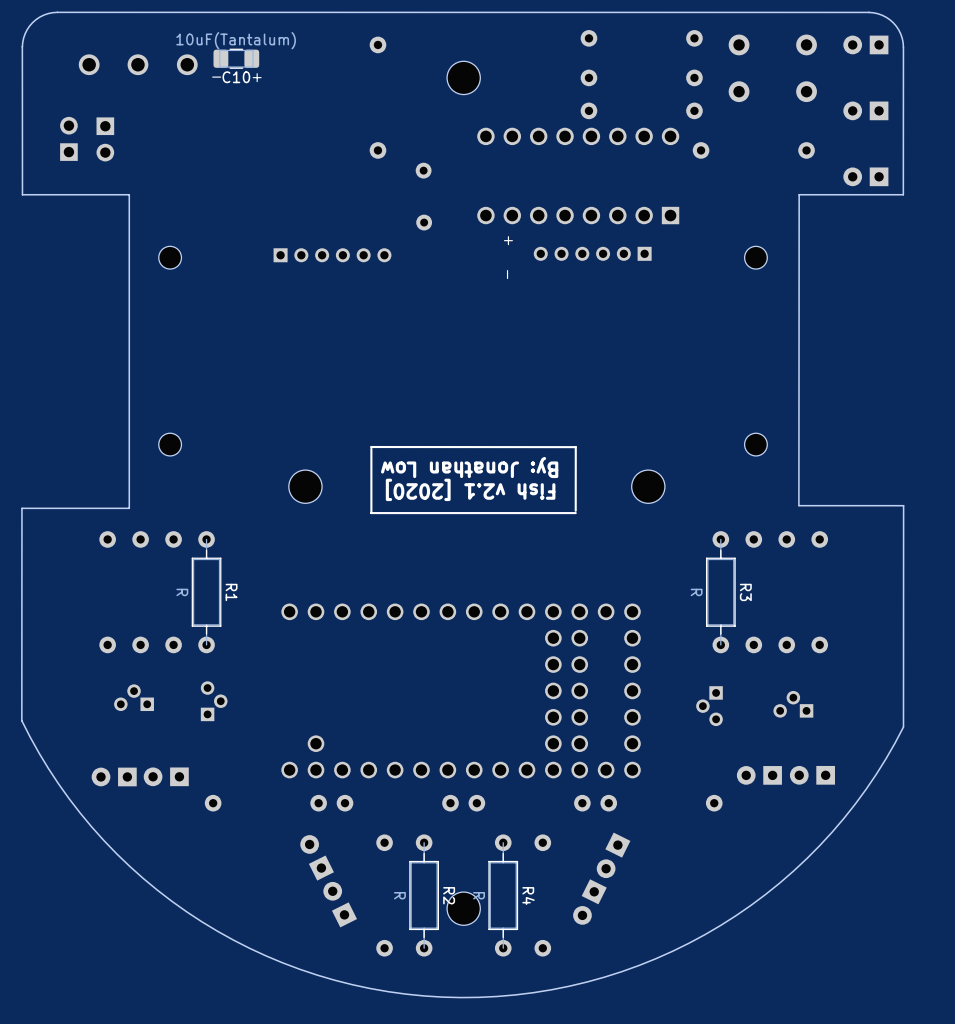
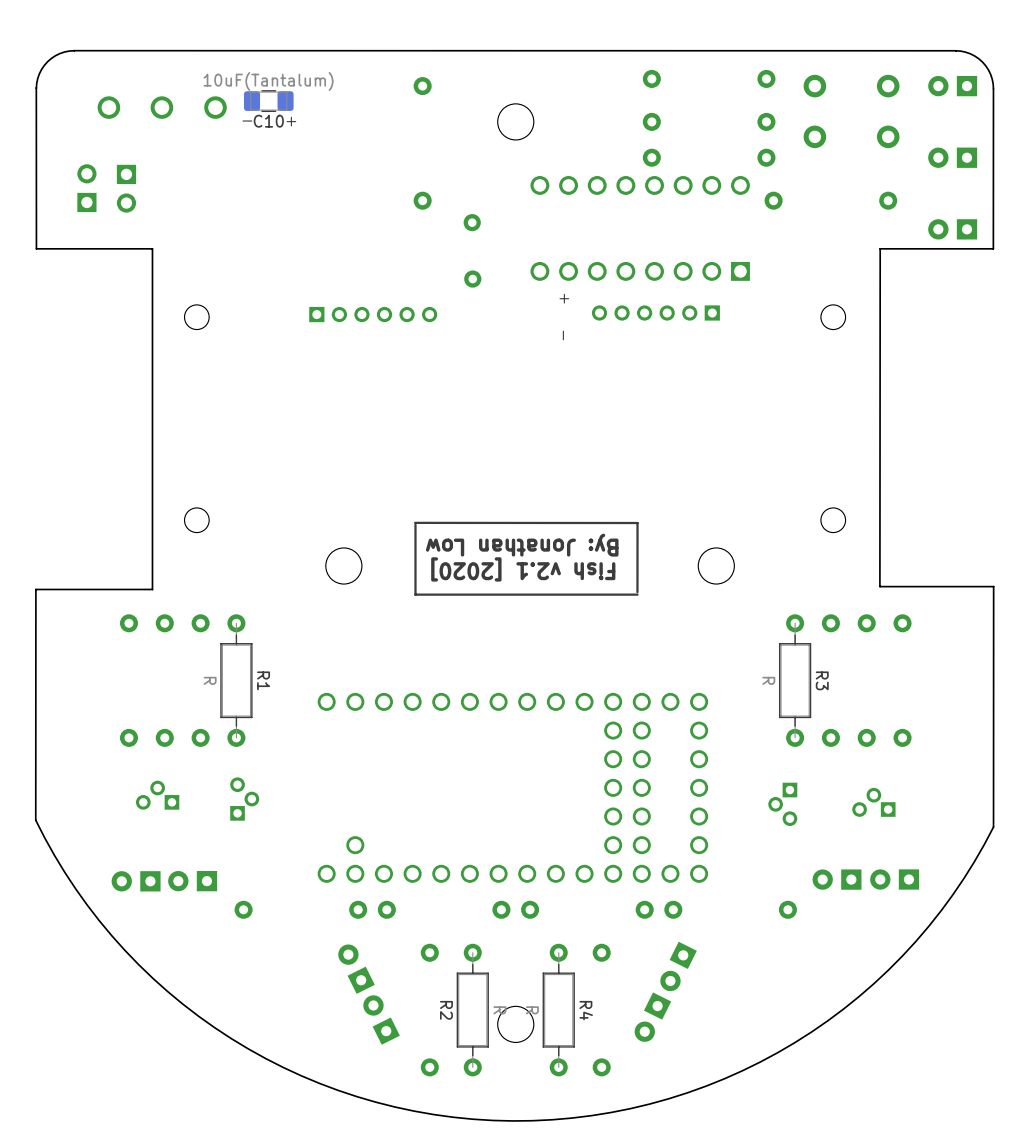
R2 value position: R (399, 895) -> R (499, 1010)
R2 name position: R2 (449, 895) -> R2 (446, 1010)

